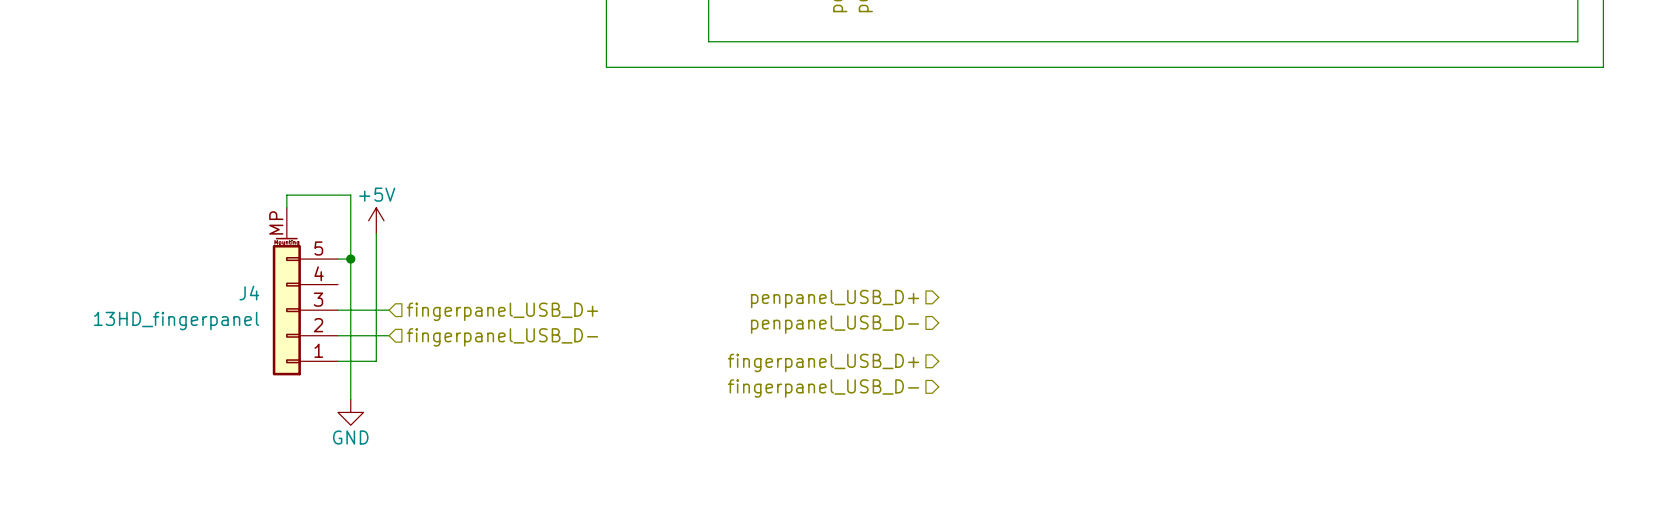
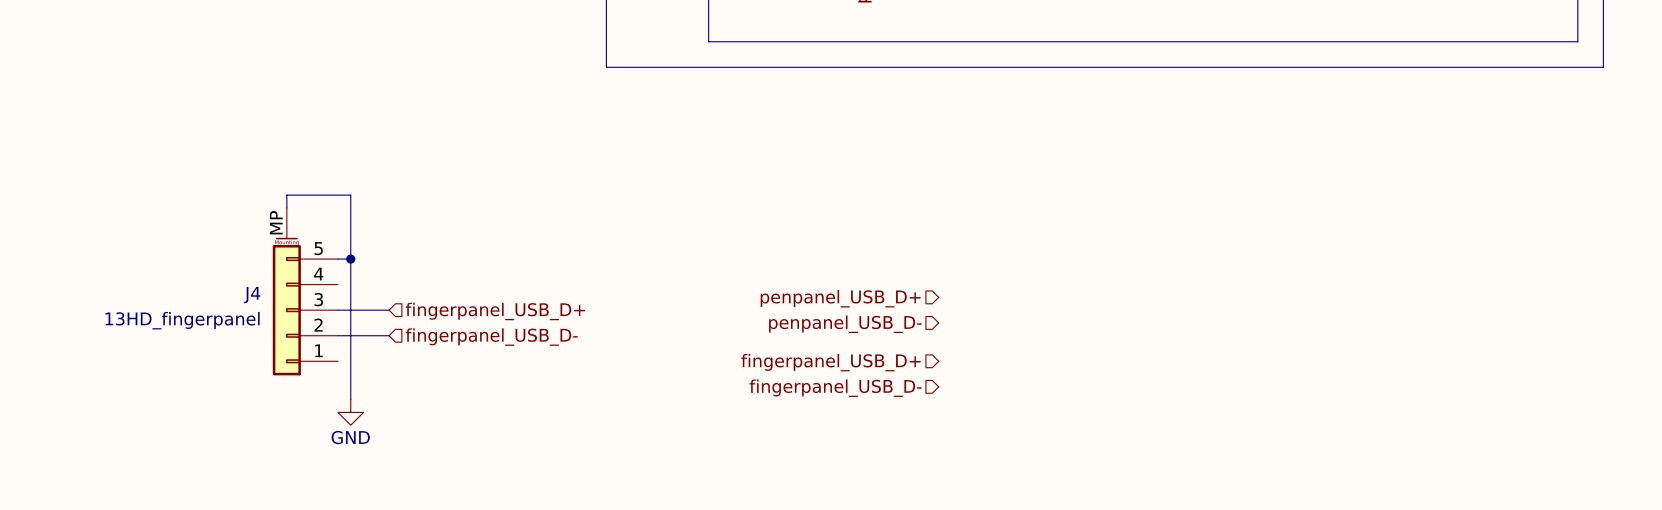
power symbol: +5V (376, 220) -> none
wire: (376, 233) (376, 361) (337, 361) -> none

